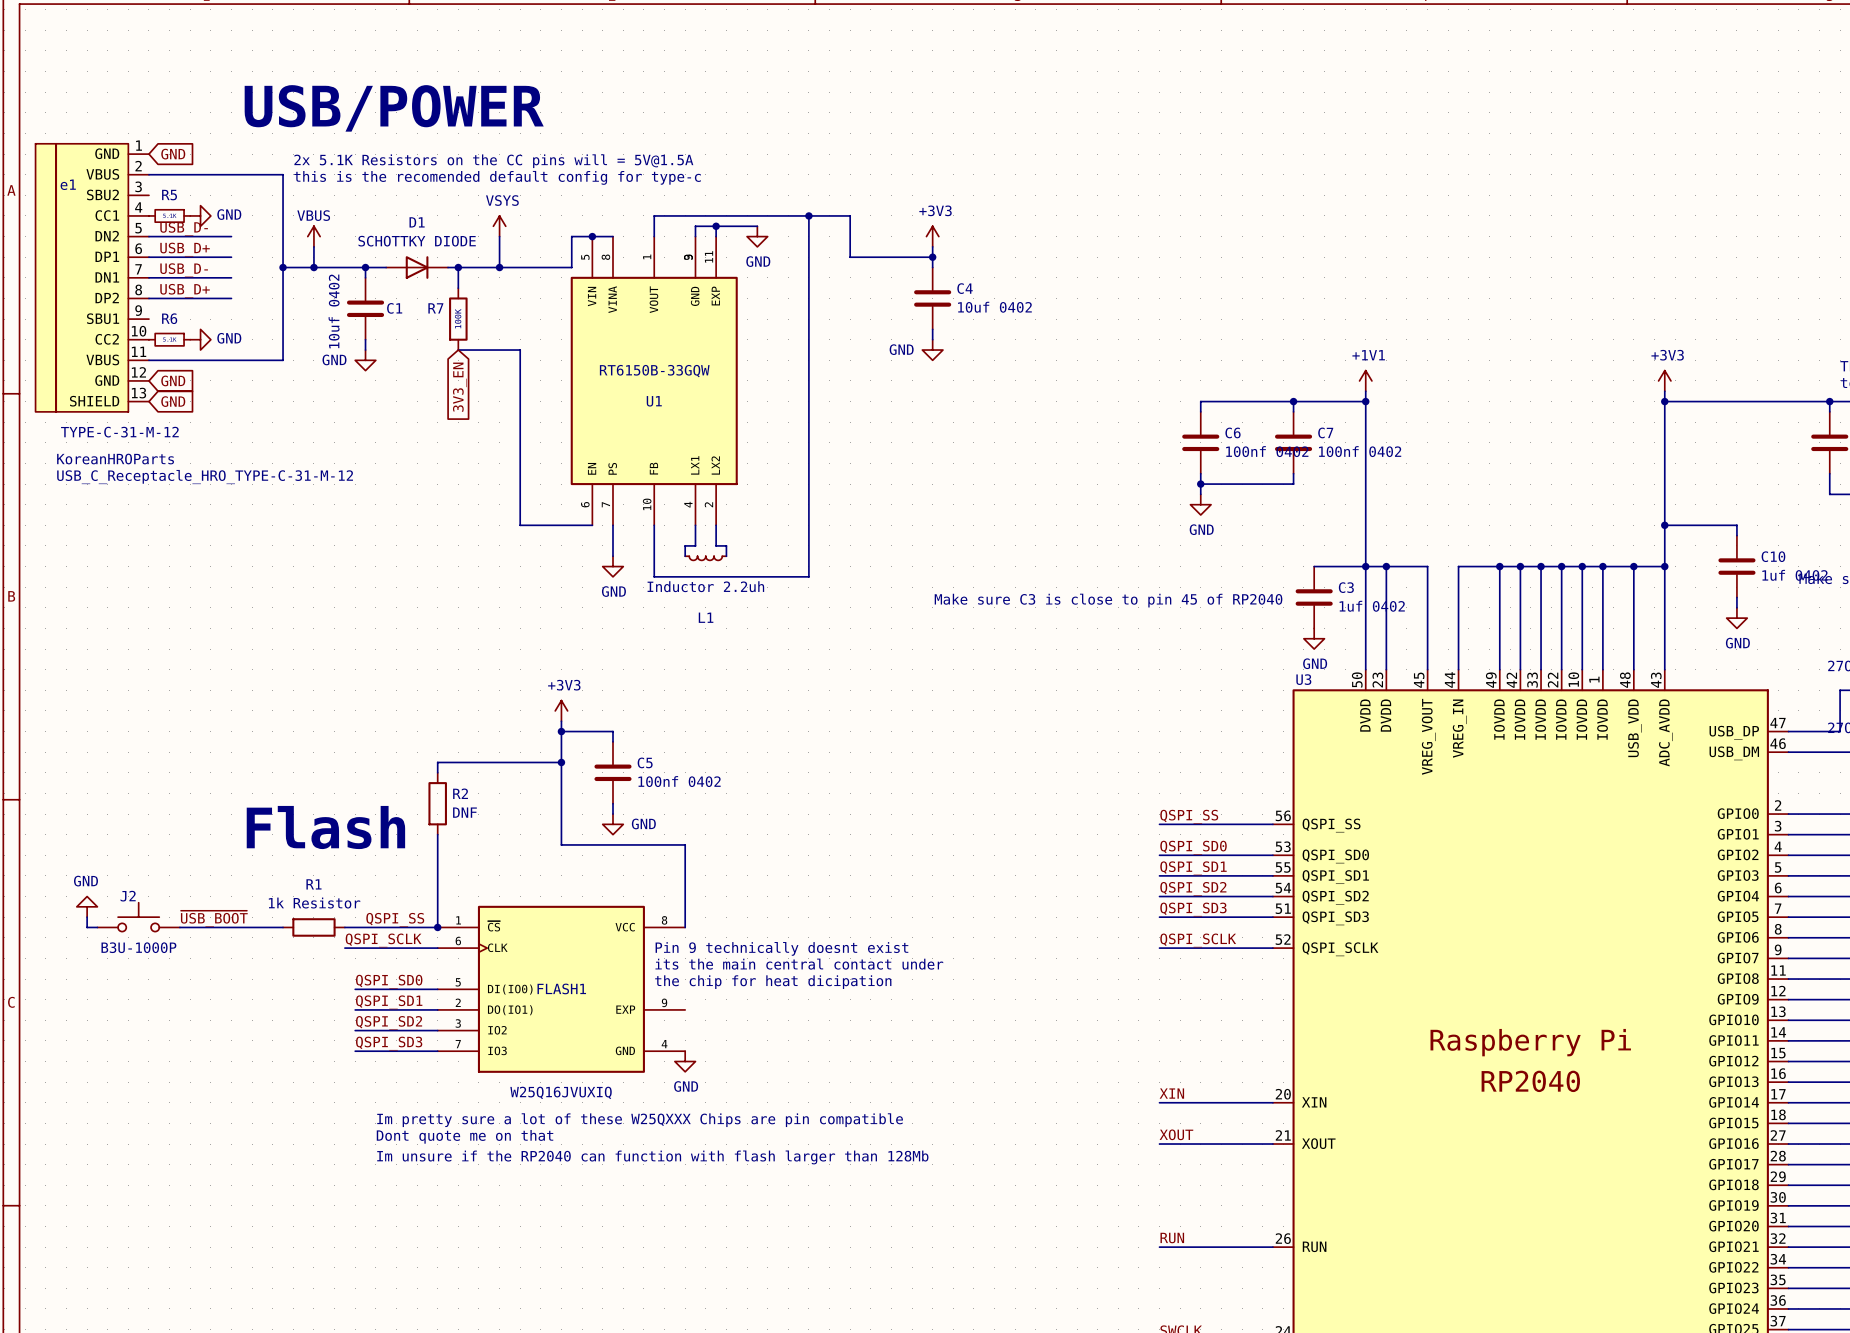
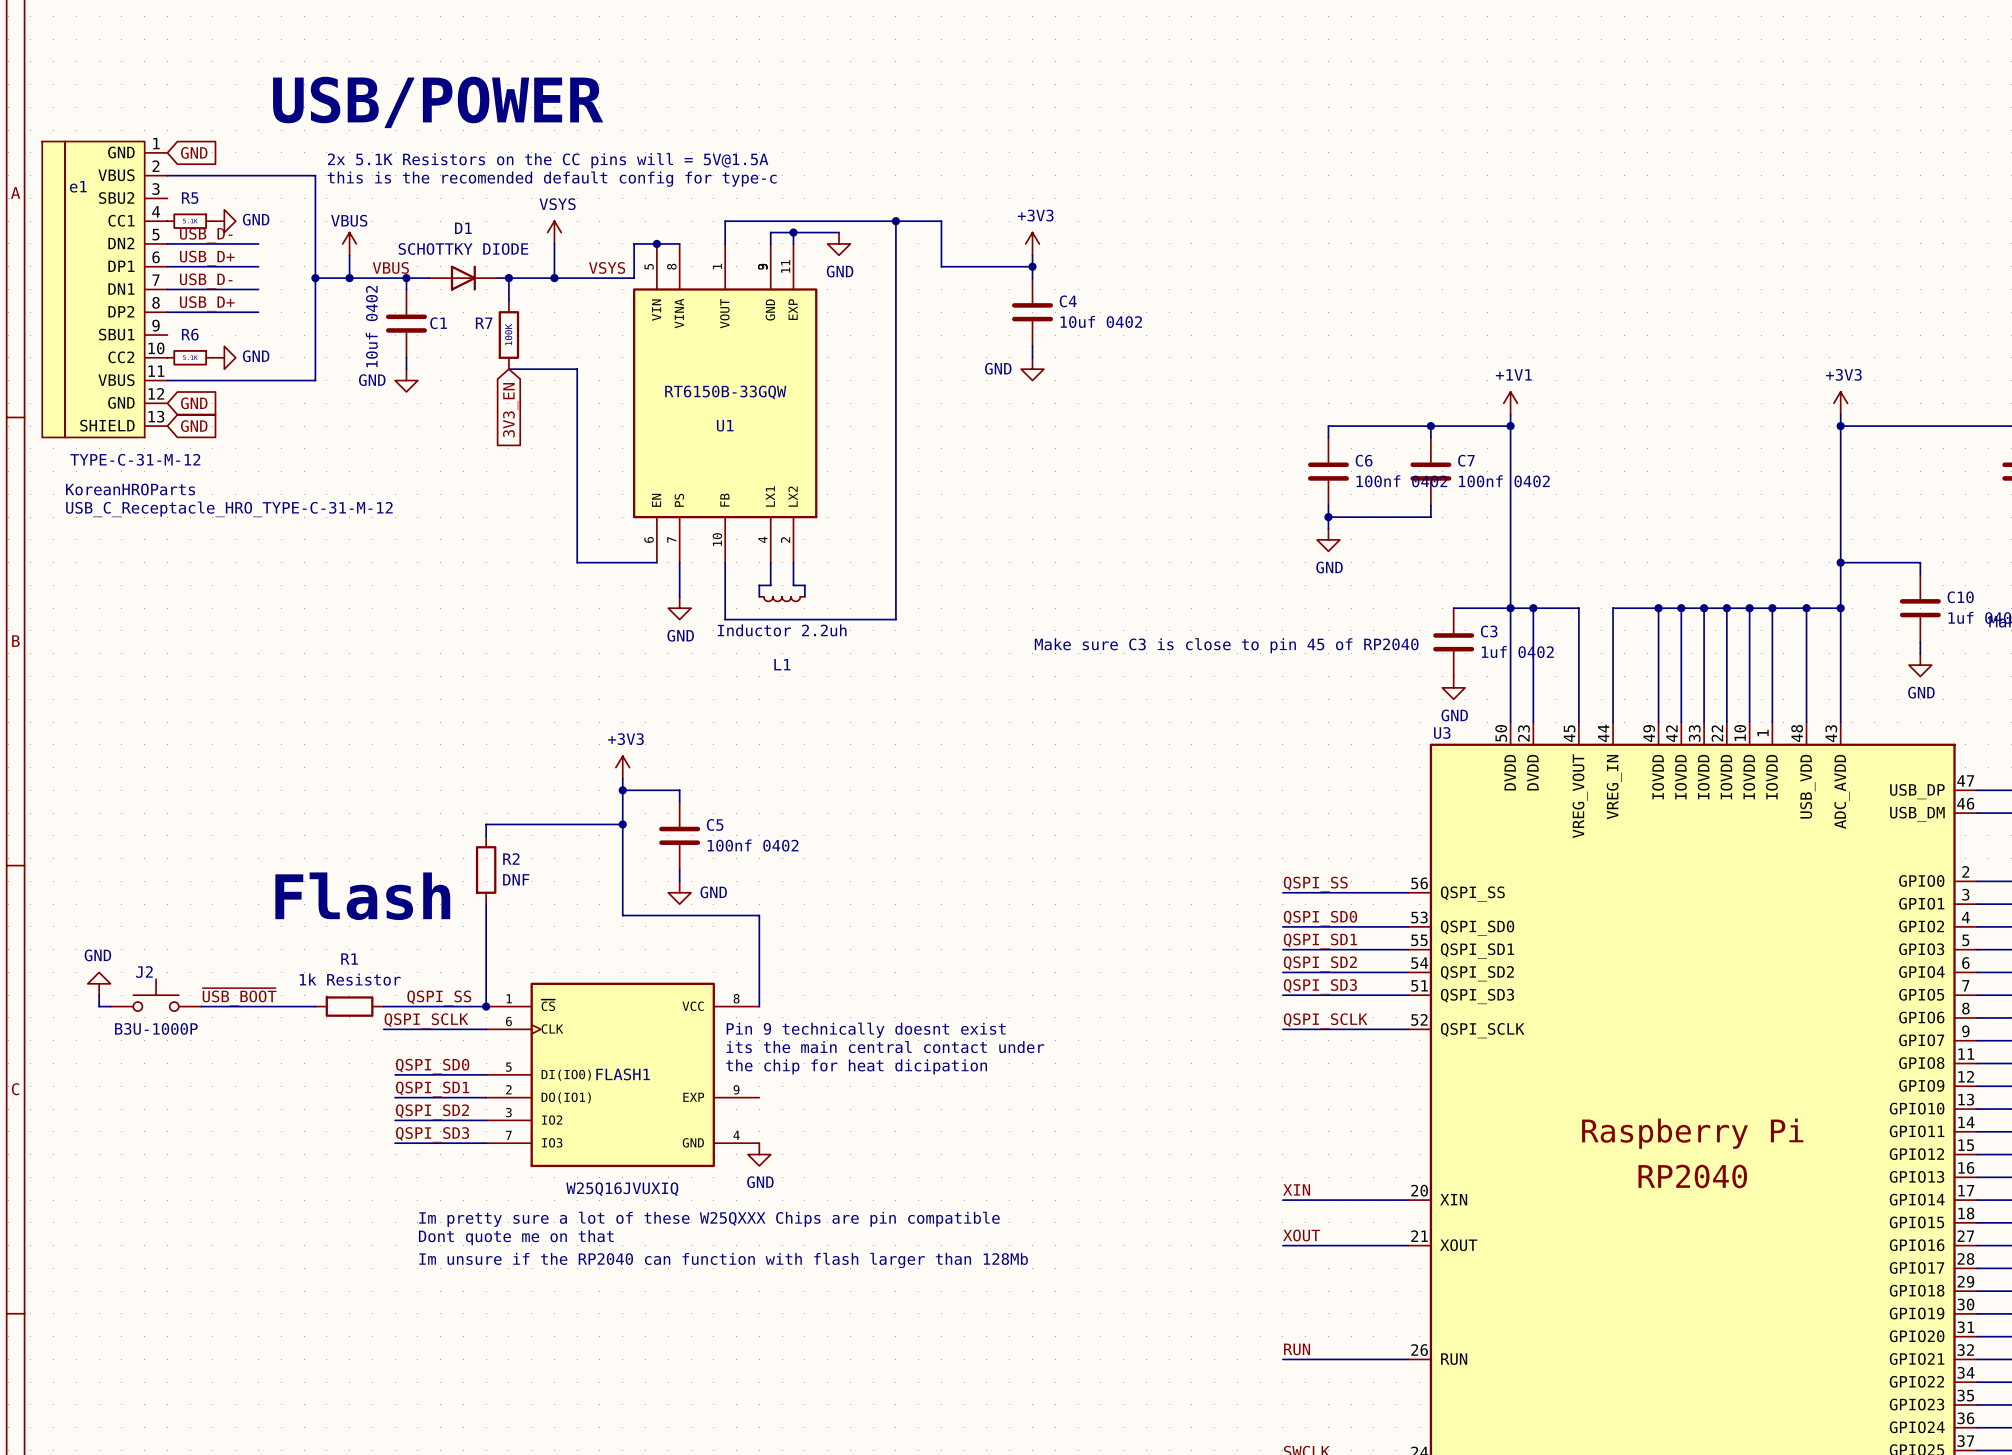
label: none -> VBUS (390, 267)
label: none -> VSYS (607, 267)

